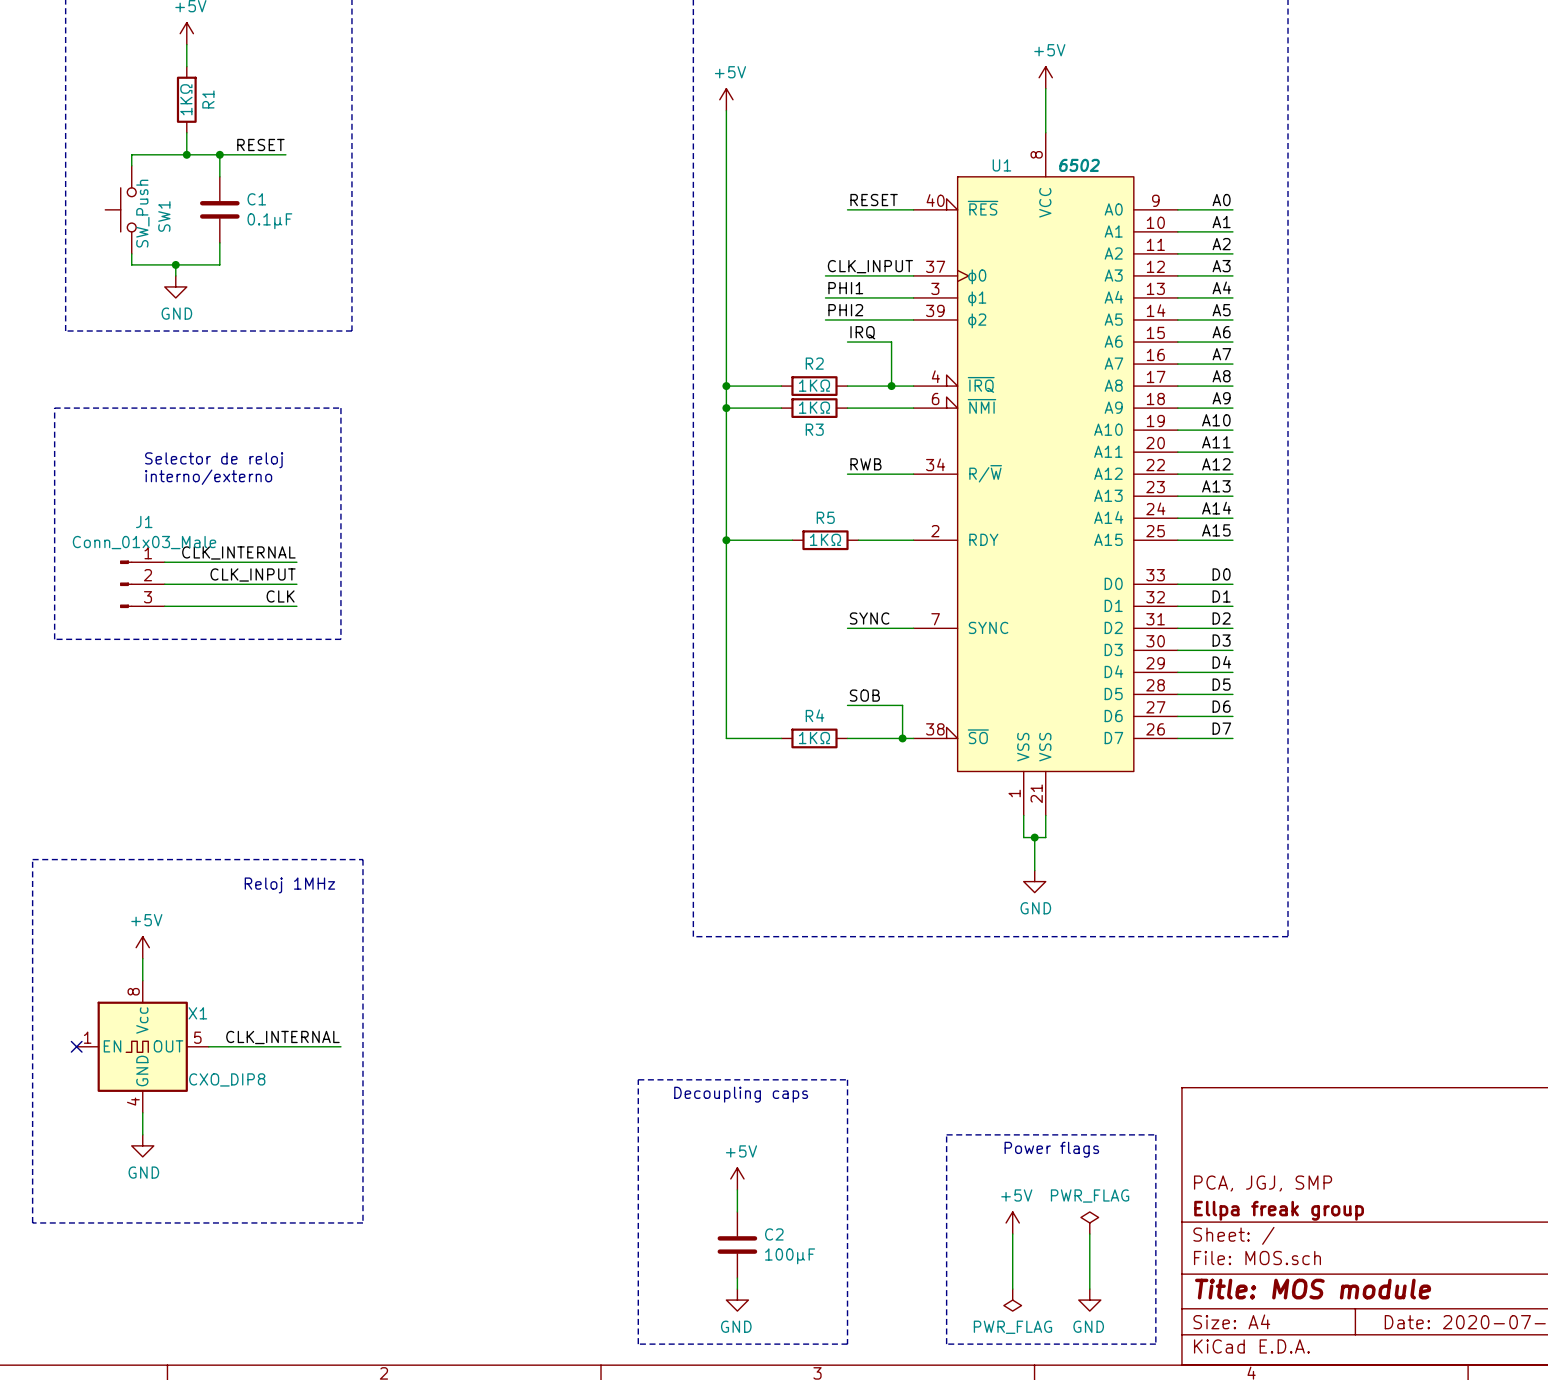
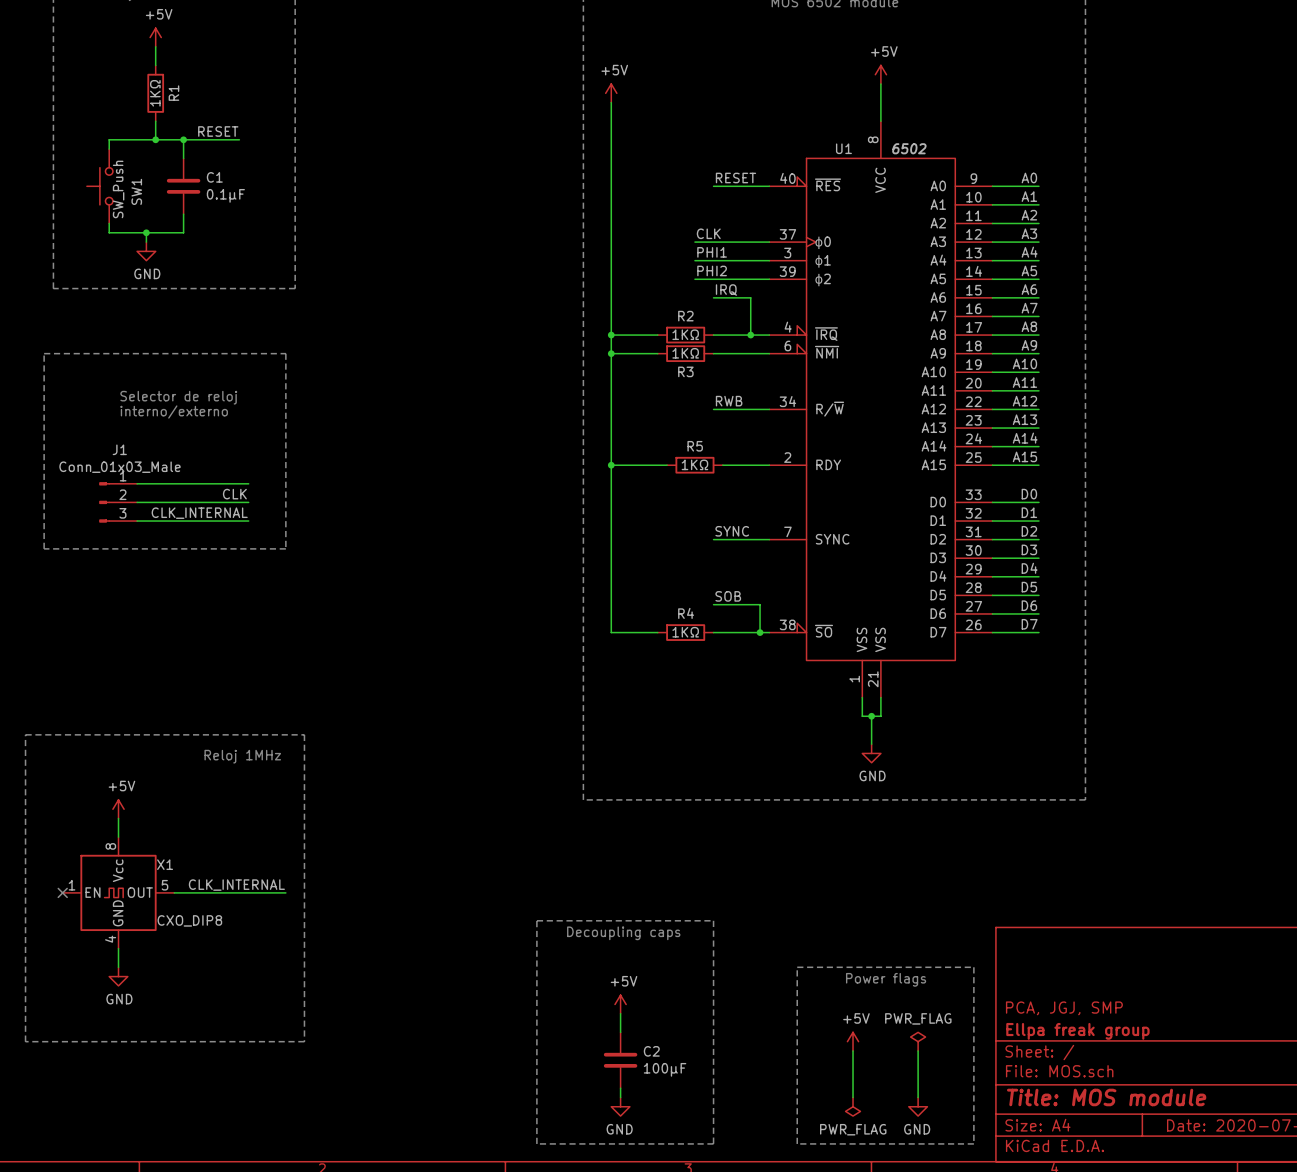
label: CLK_INPUT (870, 266) -> CLK (708, 233)
label: CLK_INTERNAL (238, 552) -> none
label: CLK_INPUT (253, 574) -> CLK (234, 494)
label: CLK (280, 596) -> CLK_INTERNAL (199, 513)

